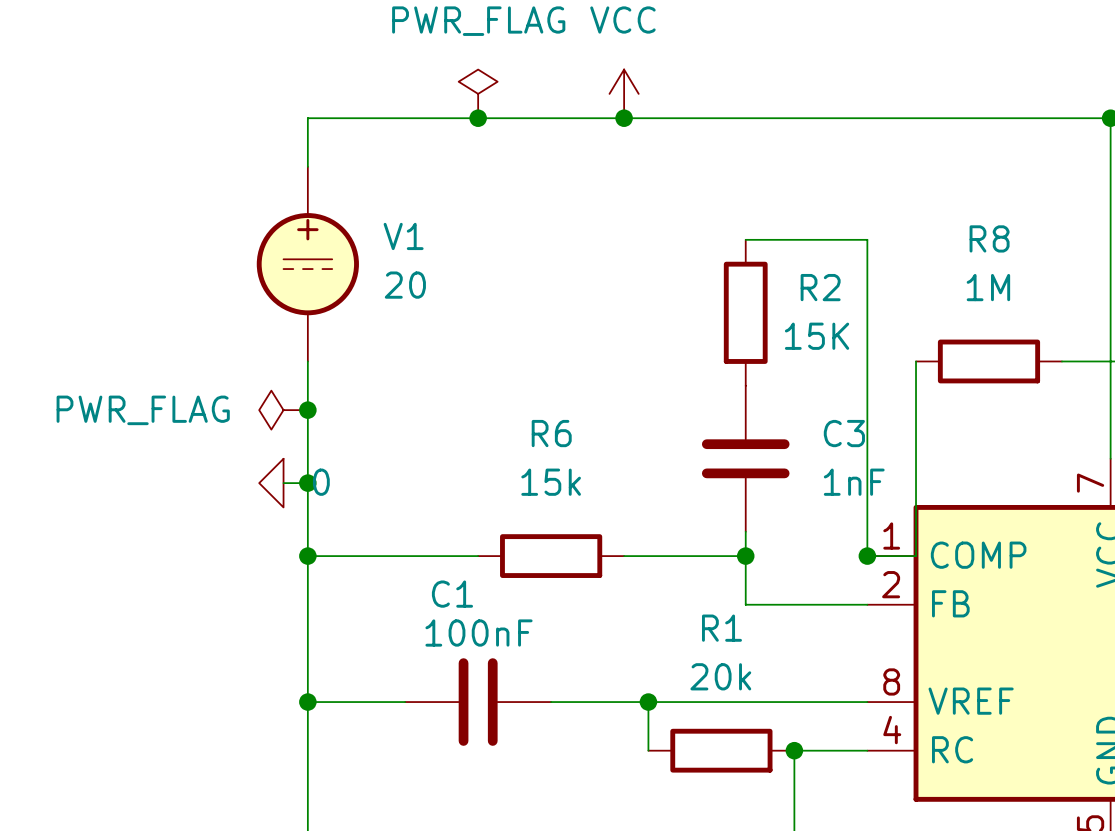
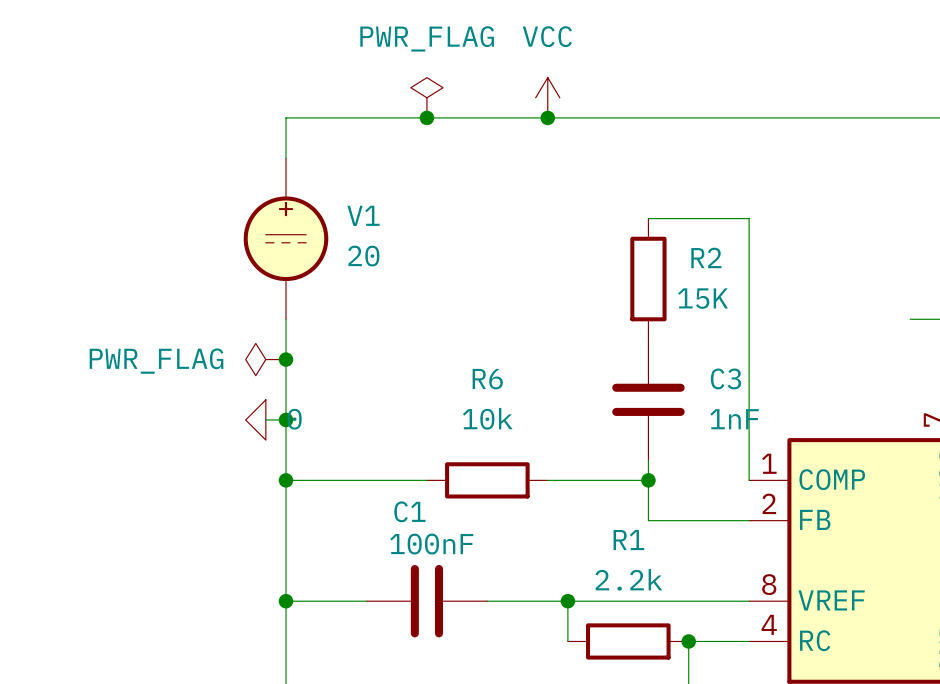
wire: (916, 361) (916, 556) (867, 556) -> none
R8: 1M (988, 361) -> none
R6 value: 15k (551, 482) -> 10k (487, 418)
junction: (867, 556) -> none
R1 value: 20k (720, 676) -> 2.2k (628, 579)

